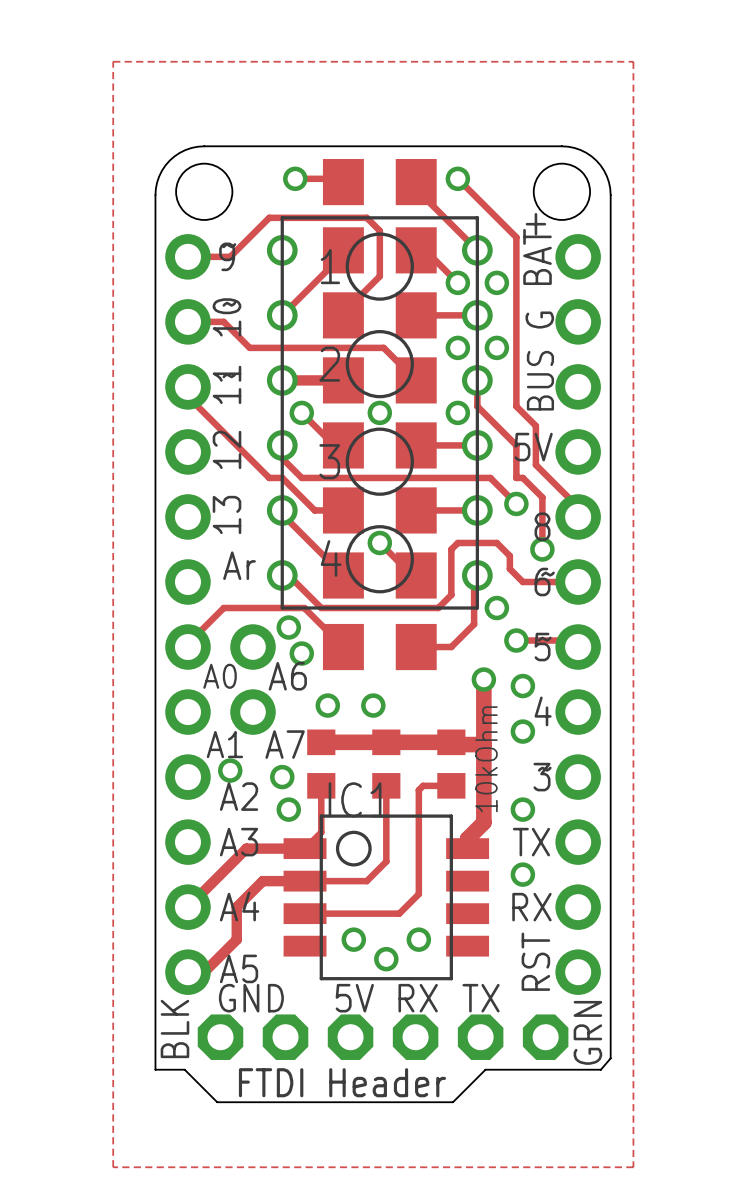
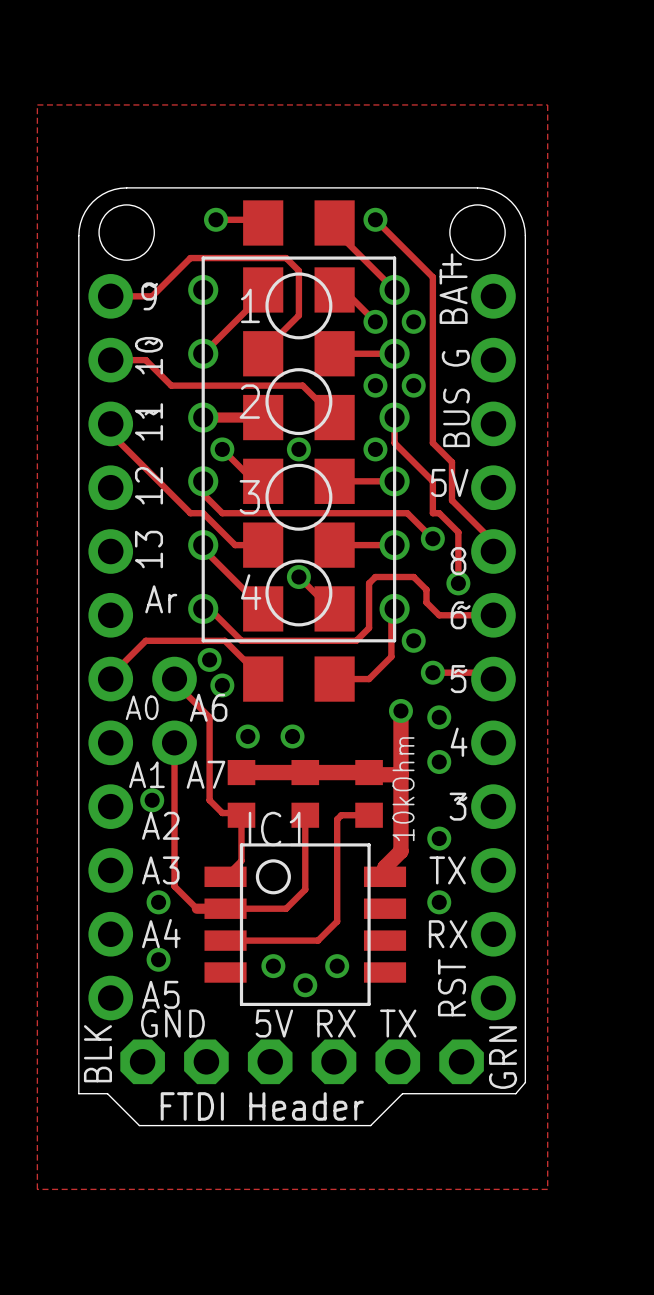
track: none -> (174, 679) (174, 682) (209, 717) (209, 800) (222, 813) (239, 813) (241, 815)
via: (282, 777) -> none
via: (288, 809) -> none
track: (305, 848) (246, 848) (187, 907) -> none
via: none -> (158, 902)
track: (275, 881) (262, 881) (236, 907) (236, 939) (204, 972) (187, 972) -> (196, 908) (174, 886) (174, 742)
via: none -> (158, 959)

